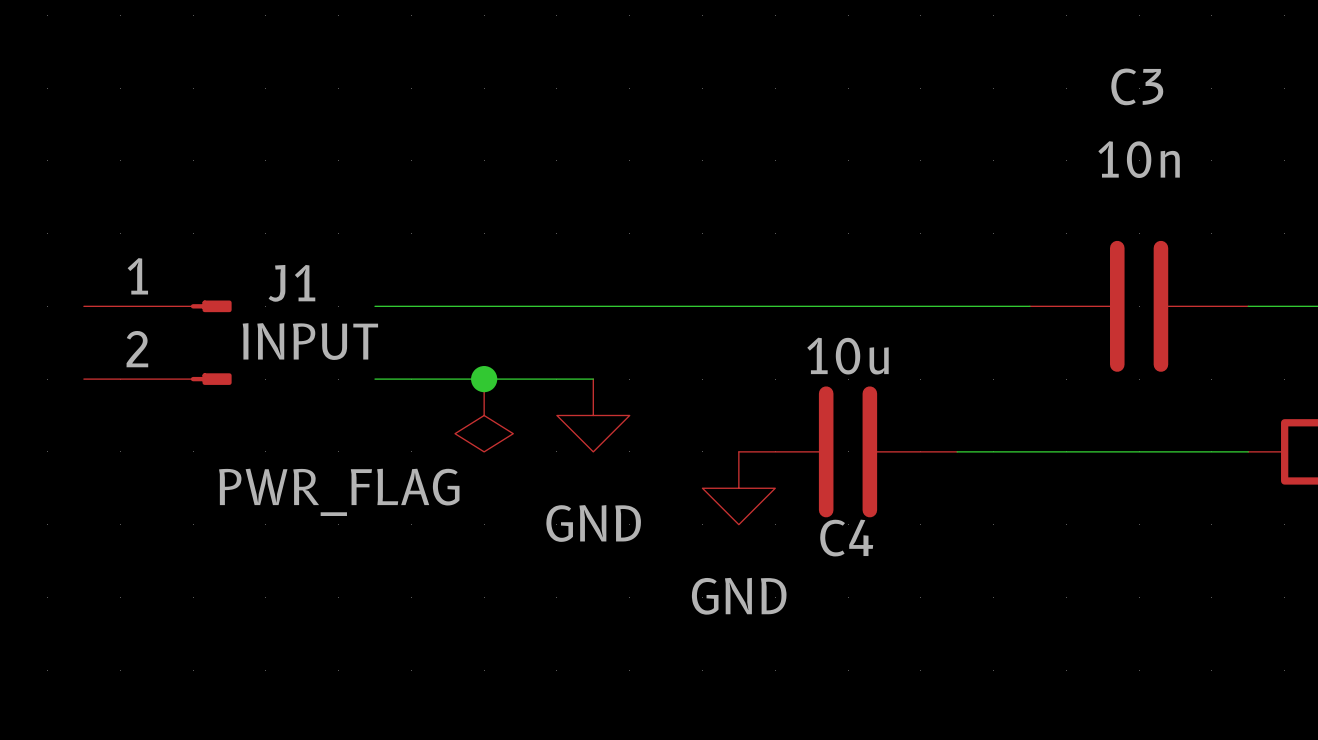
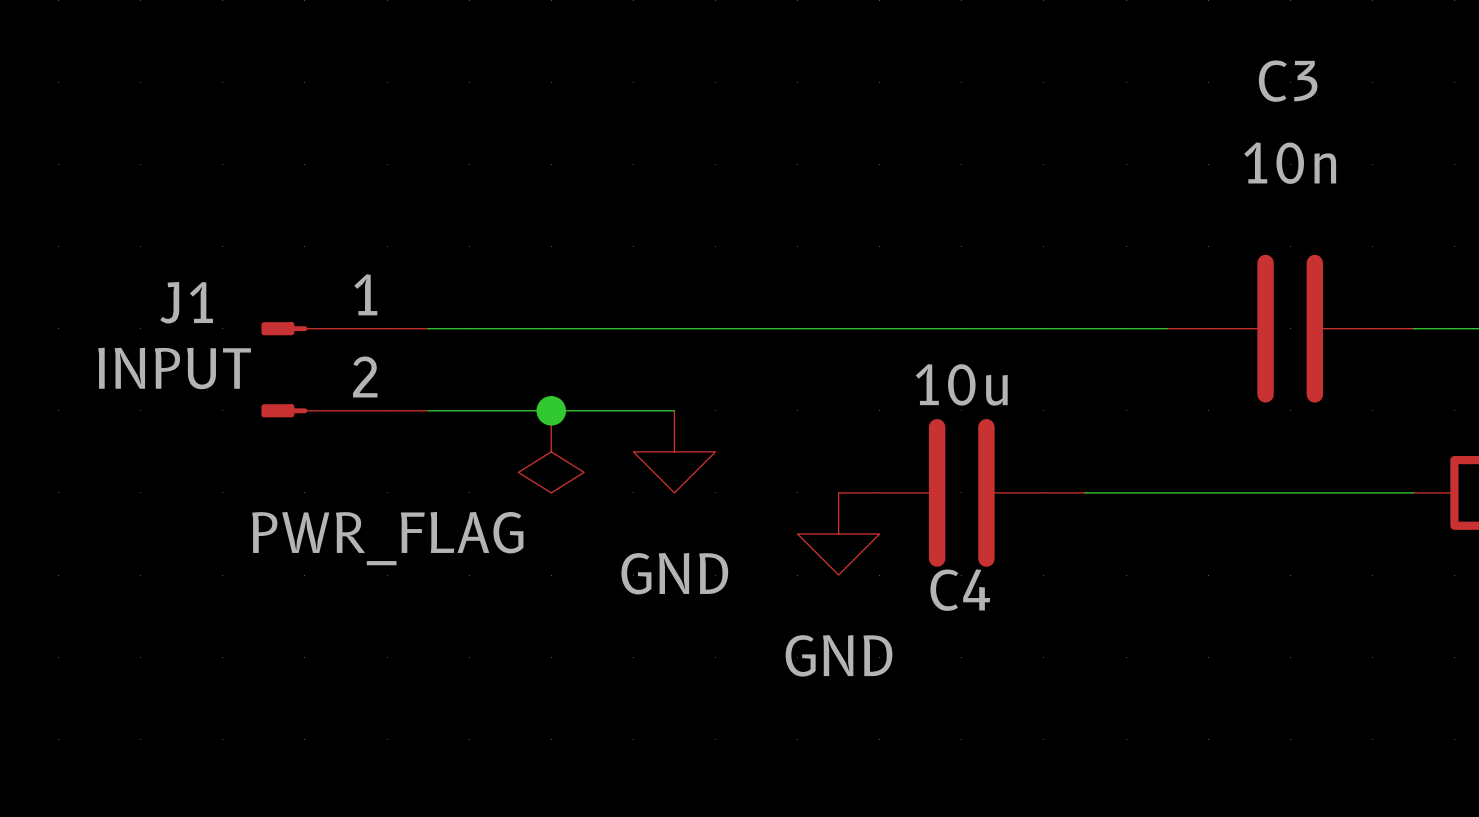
J1 position: (157, 342) -> (344, 369)
J1 flip: as is (211, 342) -> left-right (284, 369)

